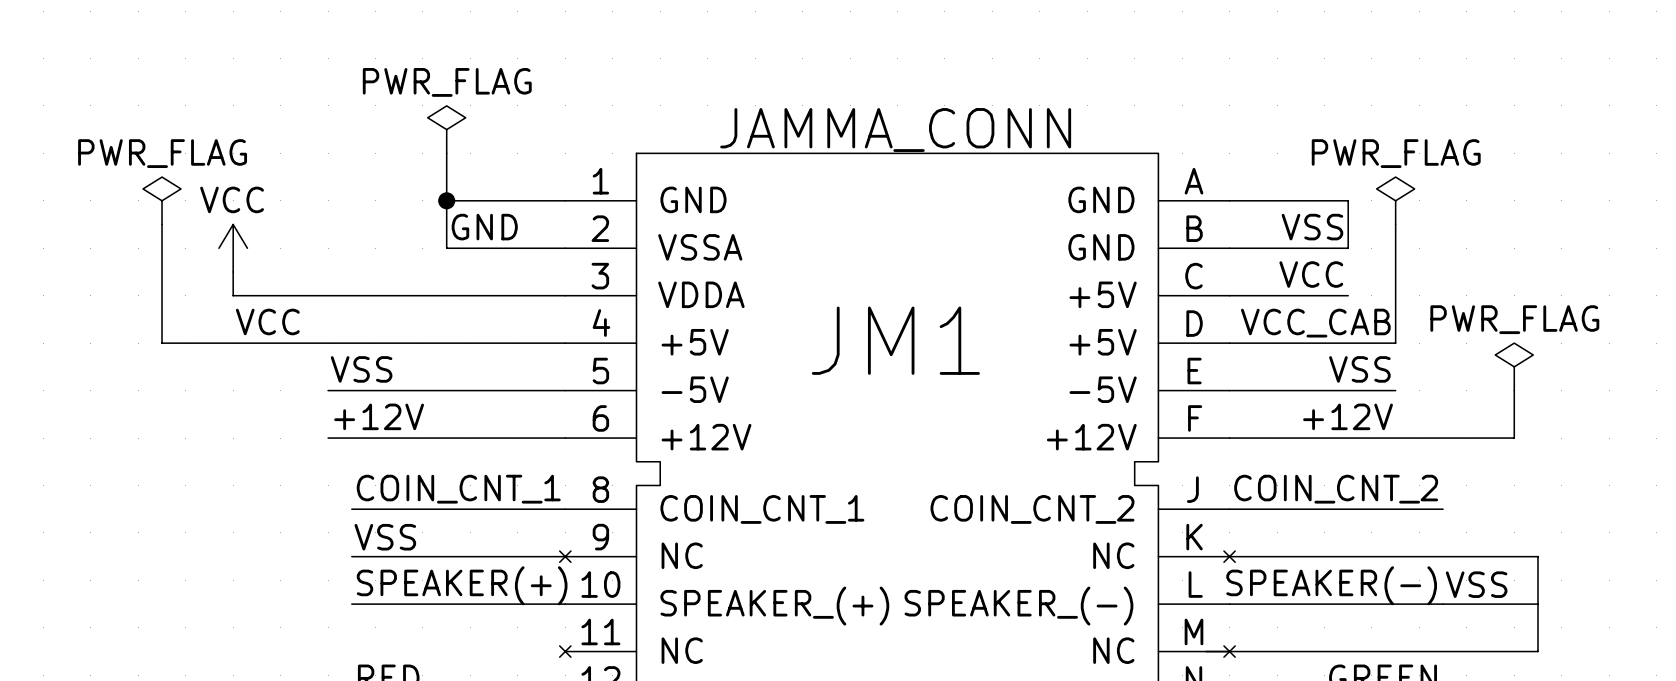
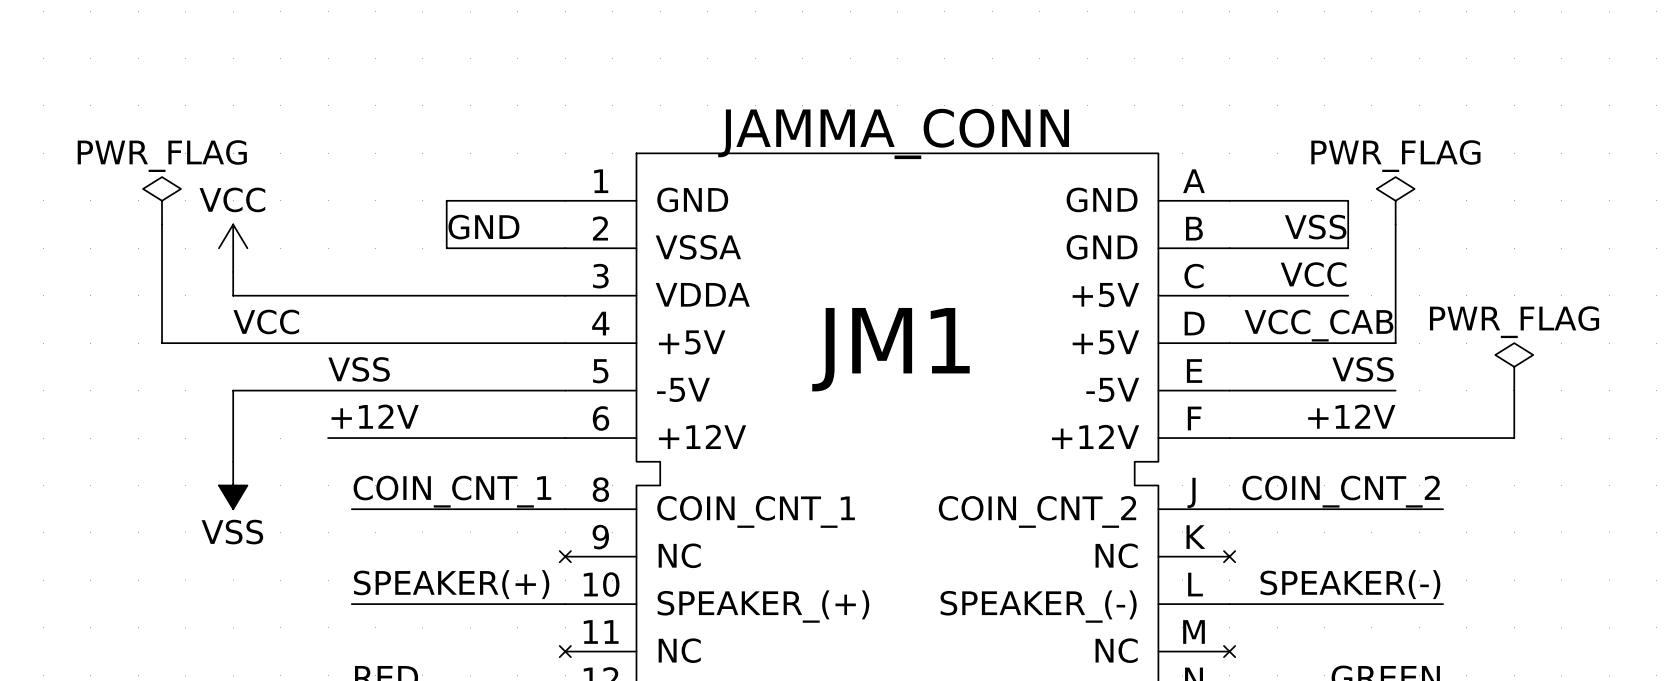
power symbol: PWR_FLAG (446, 129) -> none
wire: (446, 153) (446, 200) -> none
junction: (446, 200) -> none
wire: none -> (328, 390) (233, 390) (233, 461)
power symbol: none -> VSS (233, 485)
text: VSS (385, 537) -> none
line: (351, 556) (565, 556) -> none
line: (1229, 556) (1537, 556) (1537, 651) (1205, 651) -> none
text: VSS (1476, 584) -> none
line: (1443, 604) (1537, 604) -> none

